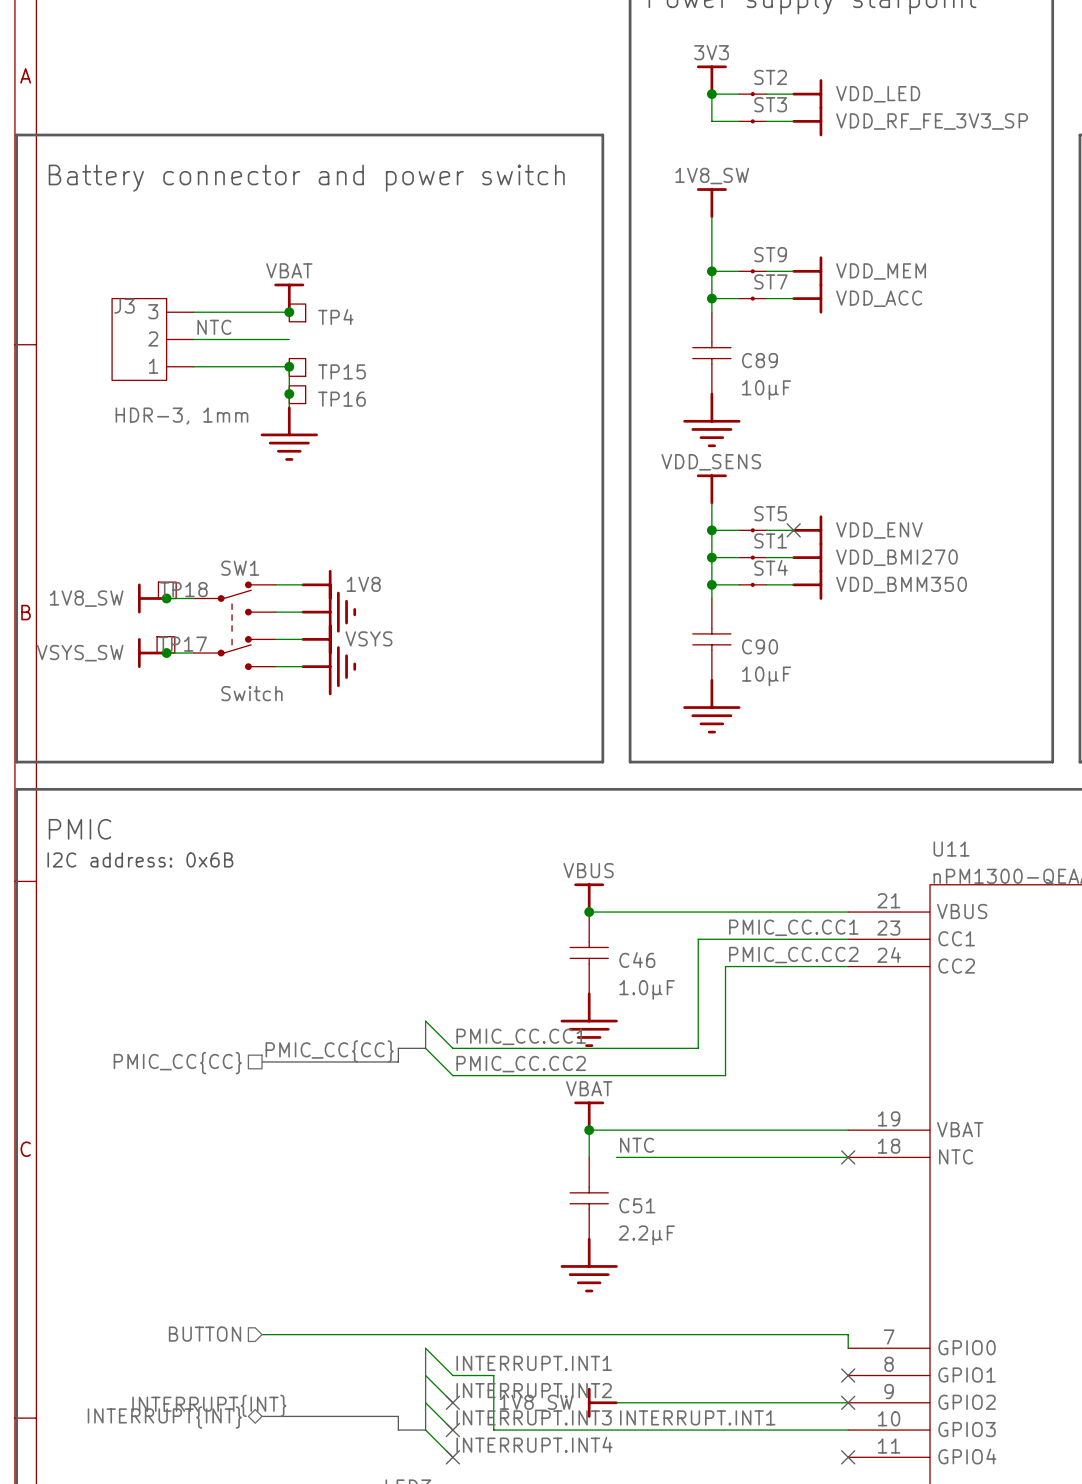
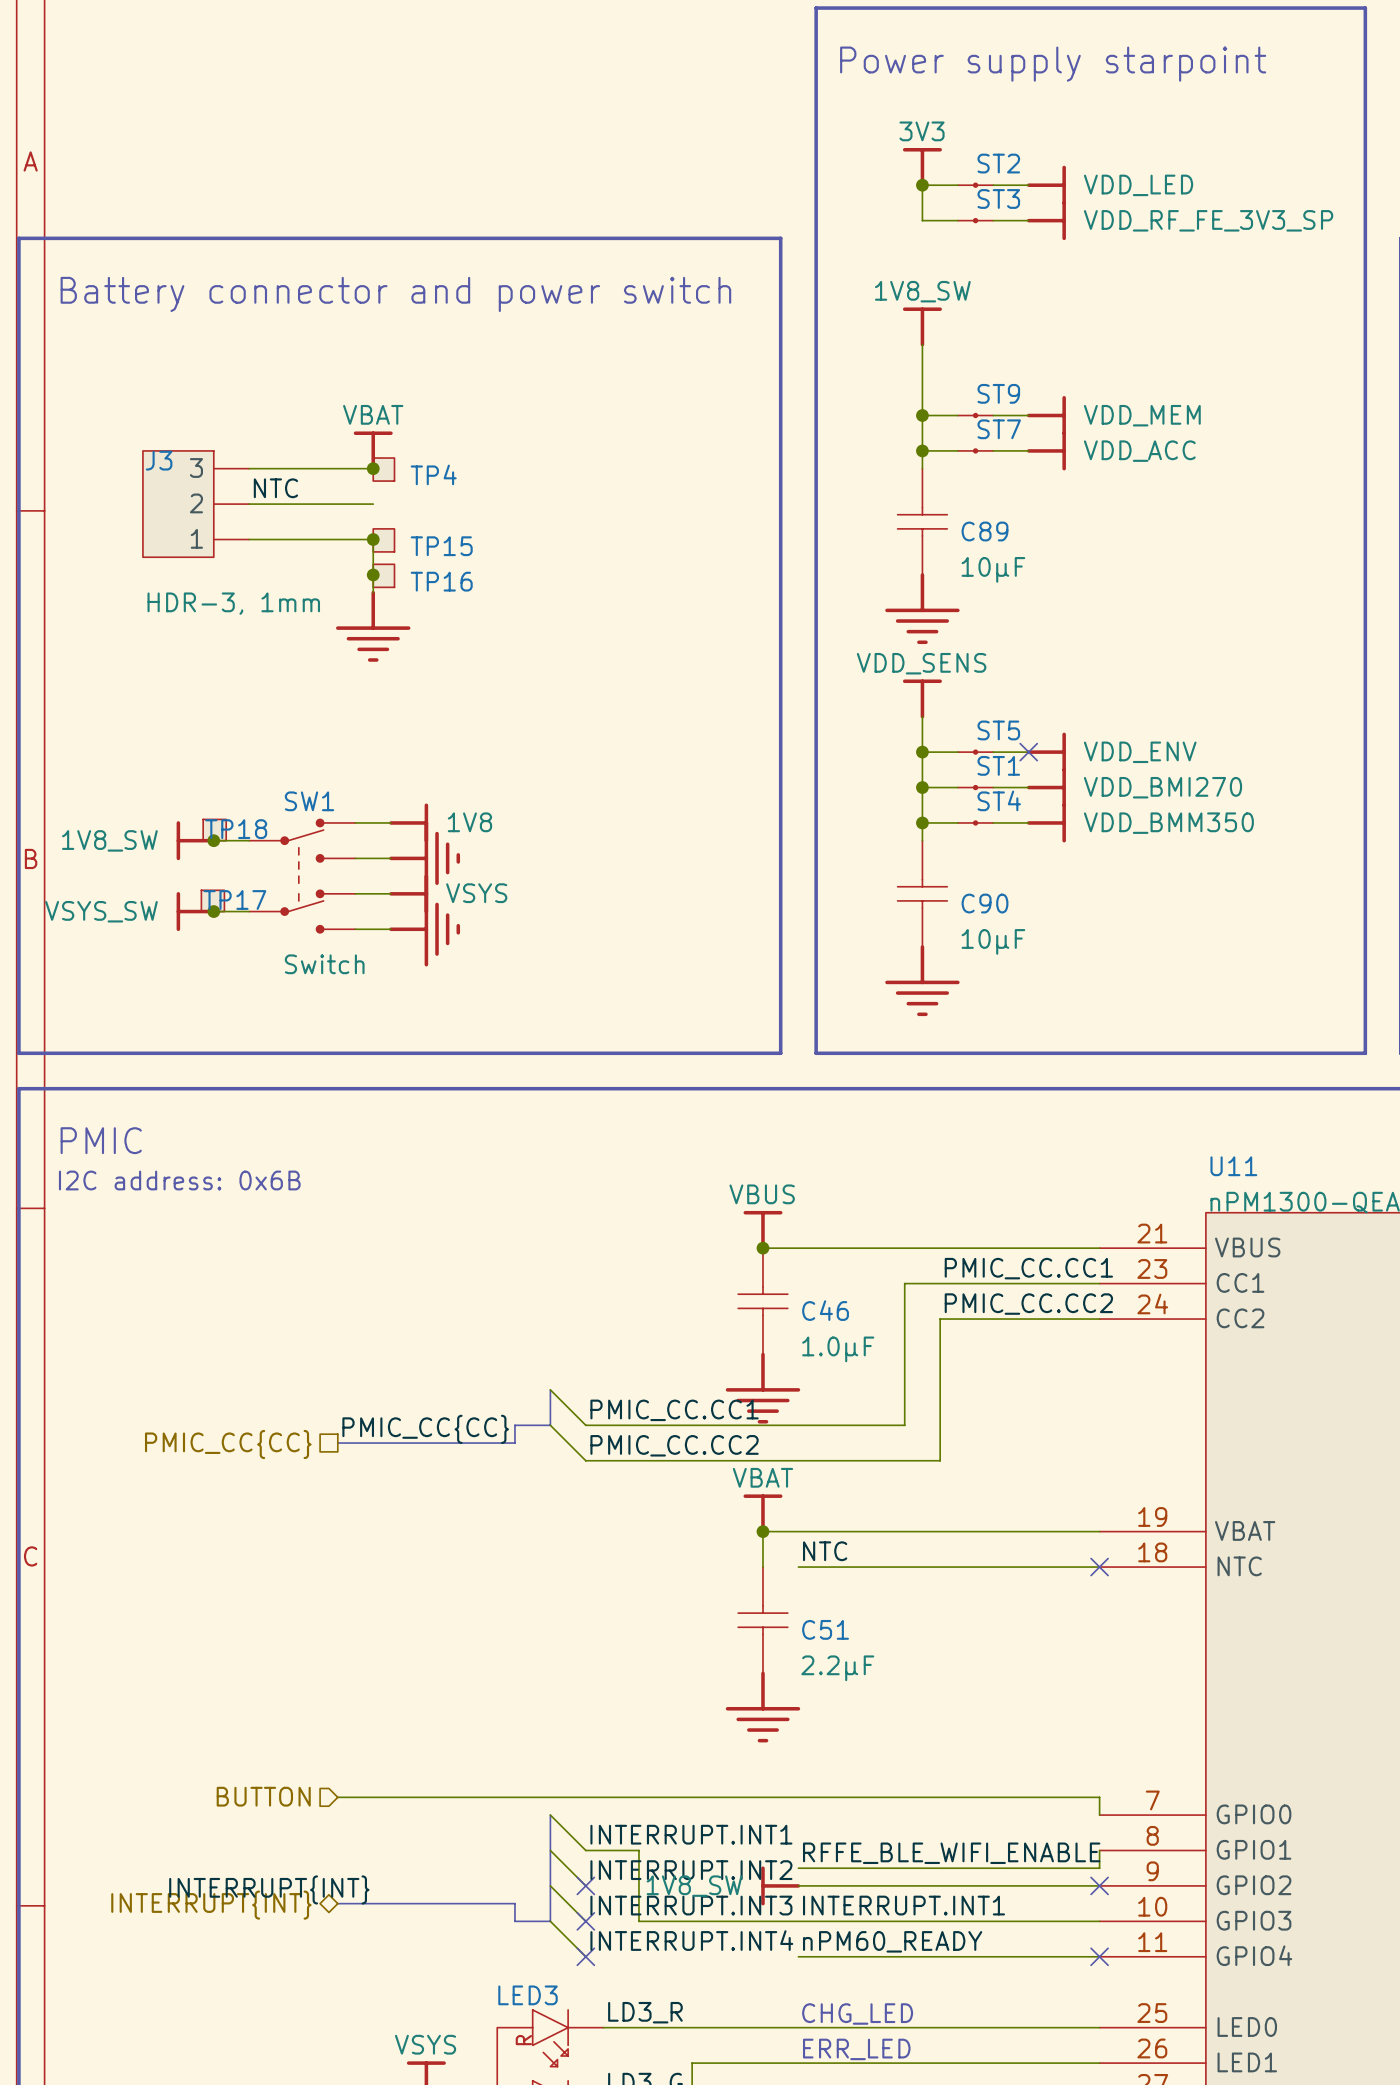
wire: none -> (1099, 1850) (1099, 1868) (798, 1868)
no-connect mark: (848, 1375) -> none
label: none -> RFFE_BLE_WIFI_ENABLE (951, 1853)
label: none -> nPM60_READY (892, 1941)
wire: none -> (798, 1956) (1099, 1956)

